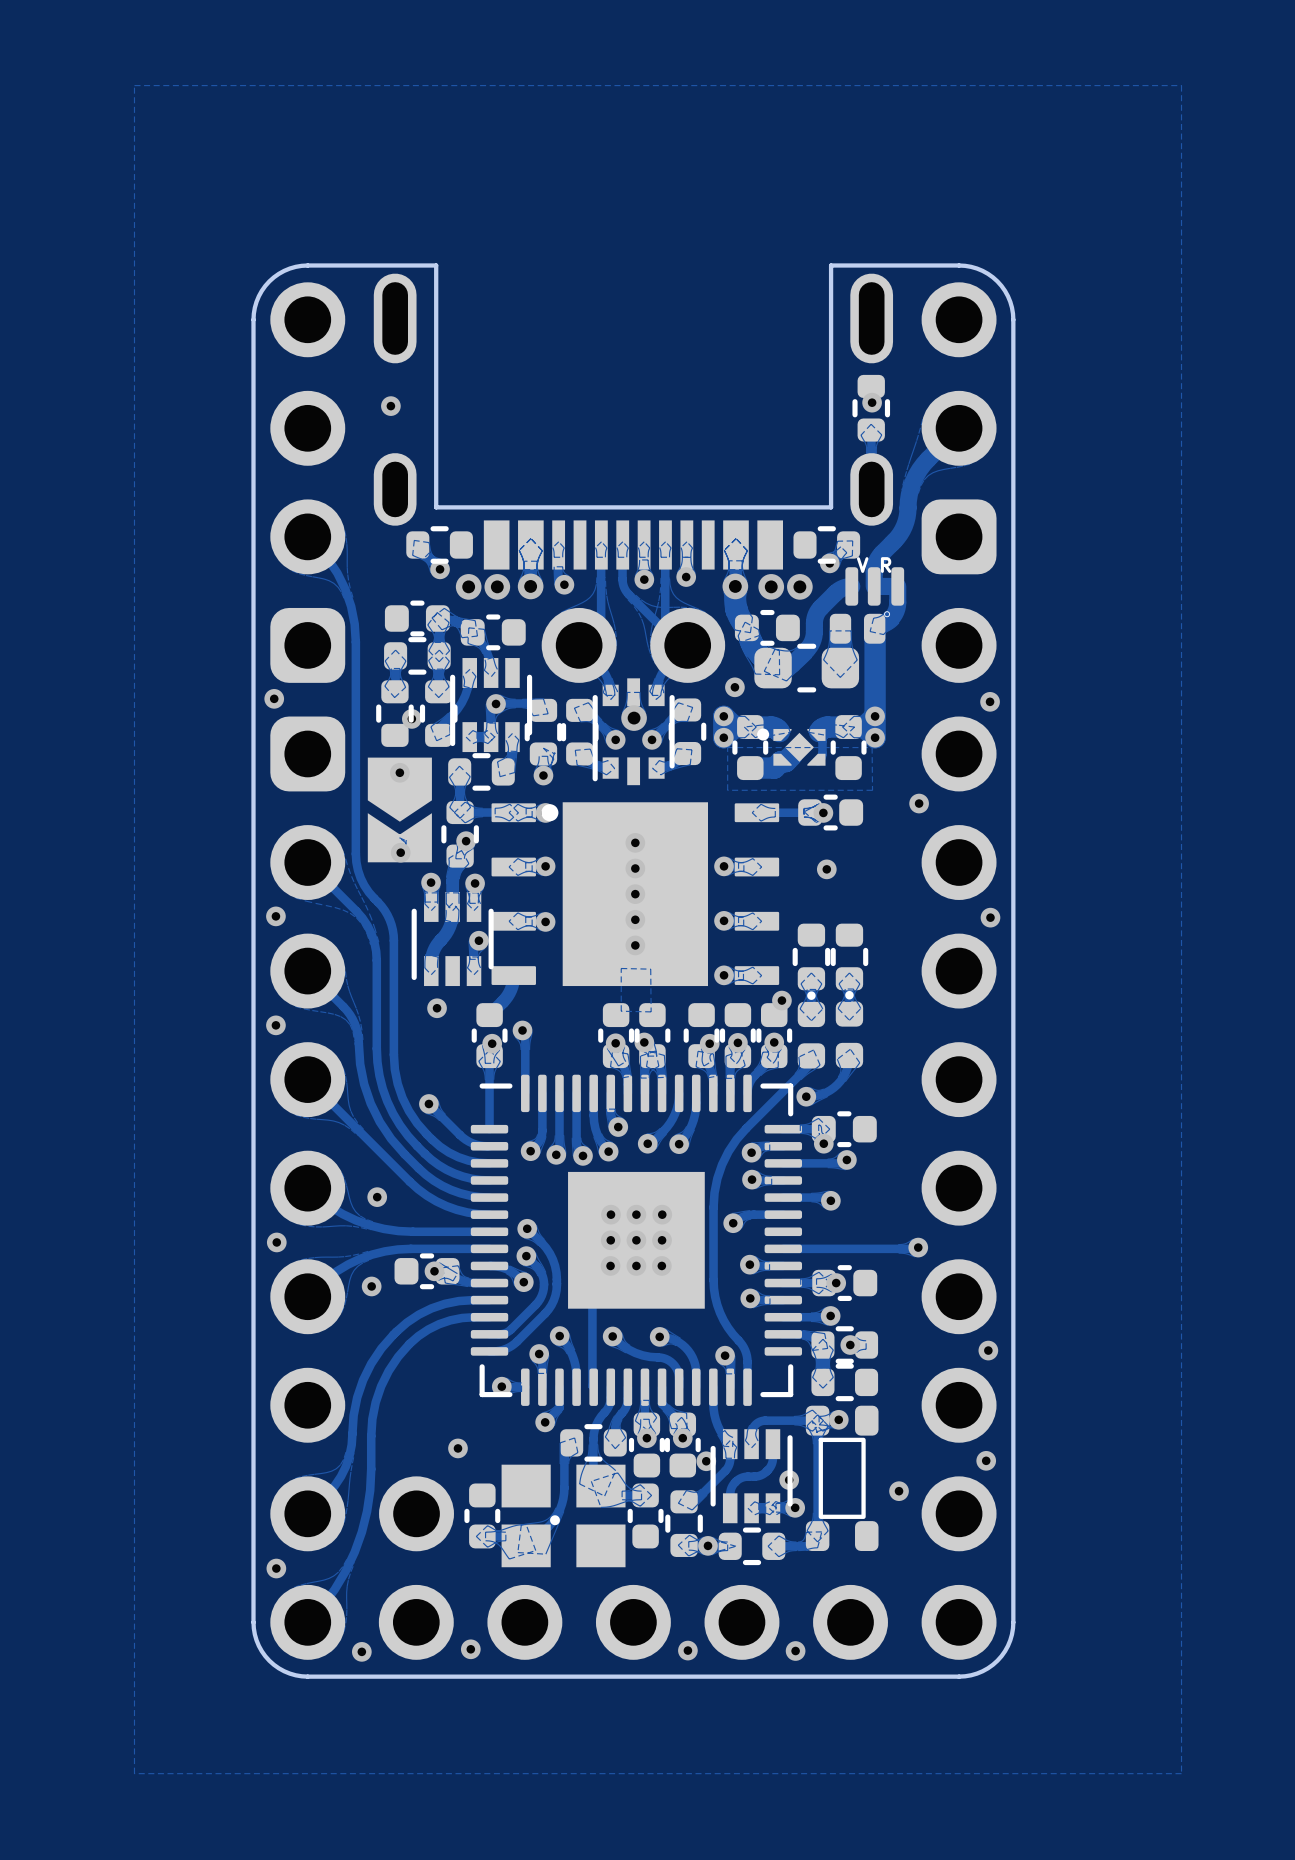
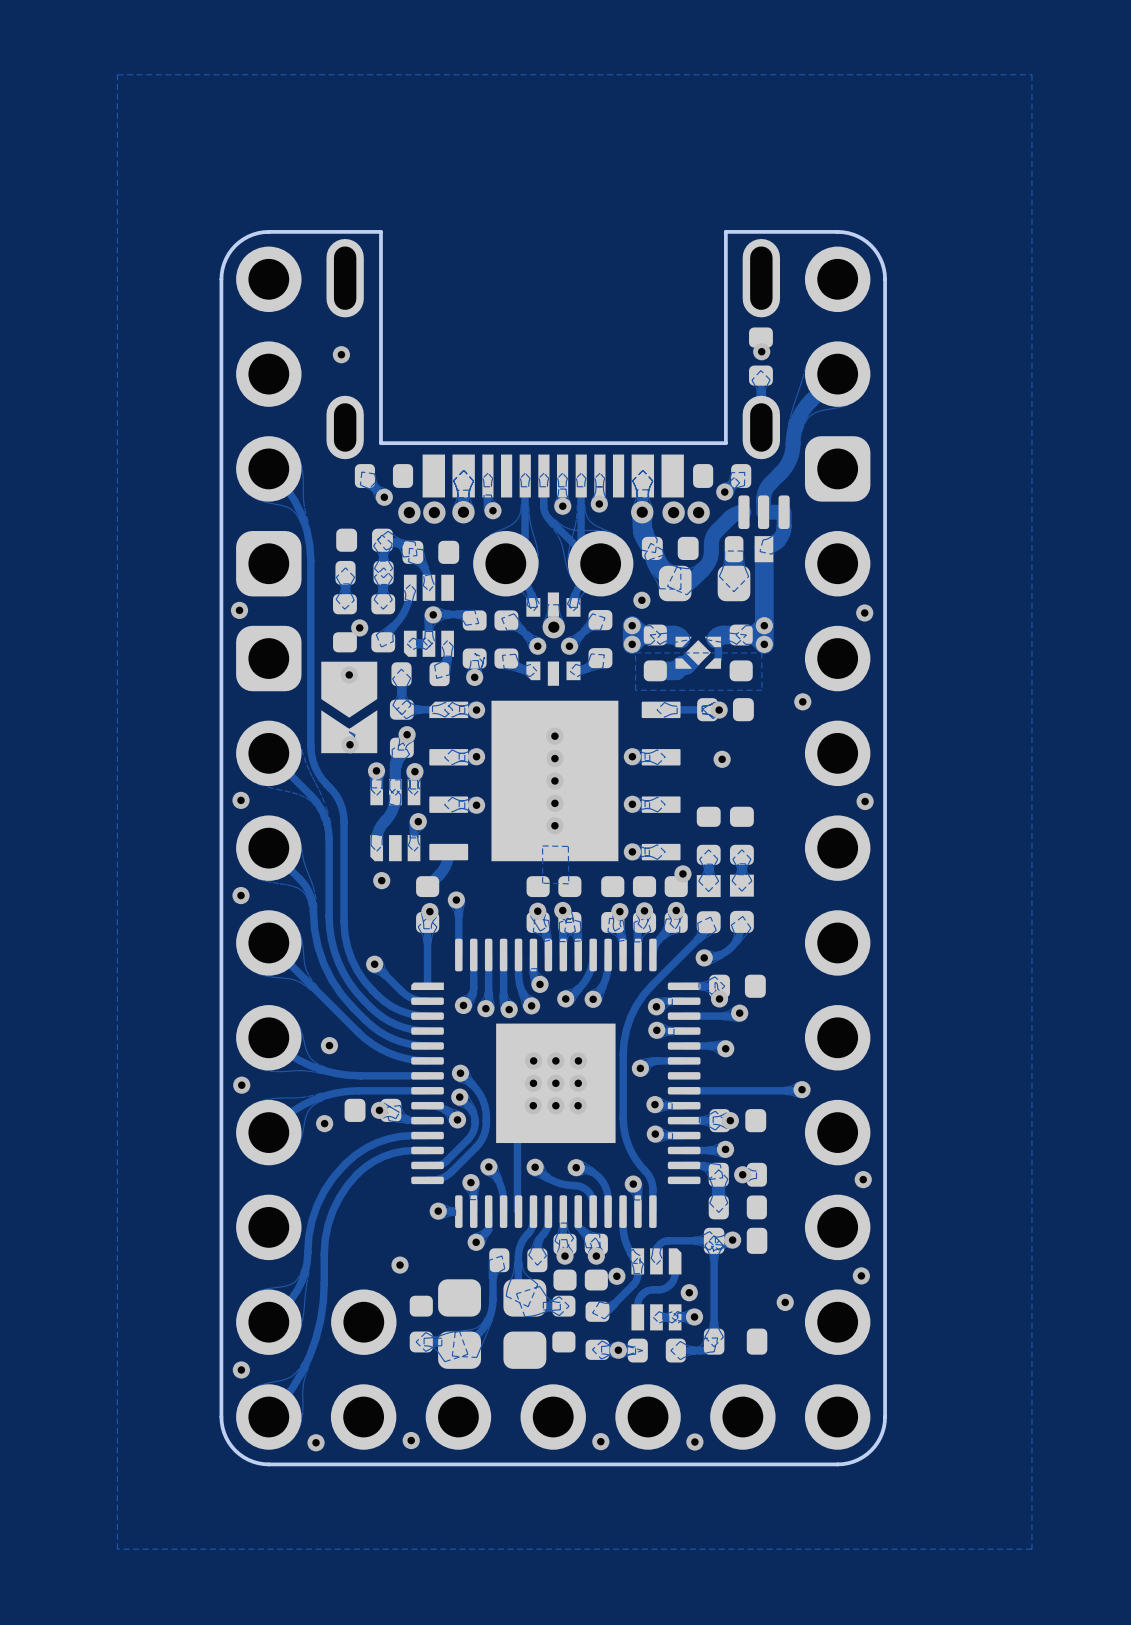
part footprint: [852, 374, 891, 442] -> [749, 327, 773, 386]
part footprint: [406, 526, 473, 564] -> [354, 464, 414, 488]
part footprint: [793, 526, 861, 564] -> [693, 464, 752, 488]
part text: V (862, 565) -> none
part text: R (886, 565) -> none
part footprint: [384, 600, 450, 637] -> [336, 528, 393, 552]
part footprint: [734, 609, 800, 646] -> [641, 536, 699, 560]
part footprint: [829, 611, 891, 644] -> [724, 536, 774, 563]
part footprint: [460, 614, 526, 651] -> [402, 540, 460, 564]
part footprint: [384, 637, 451, 675] -> [335, 560, 394, 585]
part footprint: [754, 643, 860, 693] -> [658, 565, 751, 602]
part footprint: [450, 658, 533, 753] -> [403, 574, 454, 657]
part footprint: [592, 678, 675, 786] -> [526, 592, 581, 686]
part footprint: [376, 680, 414, 747] -> [333, 594, 357, 653]
part footprint: [419, 680, 458, 747] -> [371, 594, 396, 653]
part footprint: [524, 698, 563, 766] -> [462, 610, 487, 669]
part footprint: [560, 698, 599, 766] -> [494, 610, 519, 669]
part footprint: [668, 698, 707, 766] -> [588, 610, 613, 669]
part footprint: [732, 715, 769, 781] -> [643, 624, 667, 682]
part footprint: [830, 715, 867, 781] -> [729, 624, 753, 682]
part footprint: [757, 728, 826, 766] -> [675, 636, 722, 669]
part footprint: [448, 753, 515, 791] -> [391, 662, 450, 687]
part footprint: [798, 794, 864, 831] -> [697, 698, 754, 722]
part footprint: [441, 800, 479, 868] -> [389, 699, 414, 758]
part footprint: [491, 802, 780, 987] -> [429, 700, 681, 862]
part footprint: [411, 892, 494, 987] -> [370, 779, 421, 862]
part footprint: [792, 923, 831, 991] -> [696, 806, 721, 865]
part footprint: [830, 923, 869, 991] -> [729, 806, 754, 865]
part footprint: [835, 990, 864, 1069] -> [729, 874, 754, 933]
part footprint: [797, 991, 826, 1069] -> [696, 875, 721, 934]
part footprint: [471, 1003, 508, 1069] -> [416, 876, 440, 933]
part footprint: [598, 1003, 635, 1069] -> [526, 876, 550, 933]
part footprint: [634, 1003, 671, 1069] -> [558, 876, 582, 933]
part footprint: [683, 1003, 720, 1069] -> [601, 876, 625, 933]
part footprint: [719, 1003, 756, 1069] -> [632, 876, 657, 933]
part footprint: [756, 1003, 793, 1069] -> [664, 876, 688, 933]
part footprint: [470, 1074, 803, 1406] -> [411, 938, 701, 1228]
part footprint: [811, 1111, 877, 1148] -> [709, 974, 766, 998]
part footprint: [394, 1253, 460, 1290] -> [344, 1098, 402, 1122]
part footprint: [812, 1265, 878, 1301] -> [709, 1109, 767, 1133]
part footprint: [811, 1326, 879, 1364] -> [708, 1162, 767, 1187]
part footprint: [811, 1363, 879, 1402] -> [708, 1195, 767, 1220]
part footprint: [805, 1405, 879, 1552] -> [703, 1227, 768, 1355]
part footprint: [628, 1412, 665, 1478] -> [553, 1233, 577, 1291]
part footprint: [664, 1412, 701, 1478] -> [584, 1233, 608, 1291]
part footprint: [560, 1424, 627, 1462] -> [489, 1248, 548, 1273]
part footprint: [710, 1429, 793, 1524] -> [631, 1248, 682, 1331]
part footprint: [501, 1464, 626, 1568] -> [438, 1279, 547, 1369]
part footprint: [464, 1483, 501, 1549] -> [409, 1295, 433, 1353]
part footprint: [627, 1483, 664, 1549] -> [552, 1295, 576, 1353]
part footprint: [665, 1490, 703, 1557] -> [585, 1301, 610, 1360]
part footprint: [718, 1527, 786, 1566] -> [627, 1338, 686, 1363]

